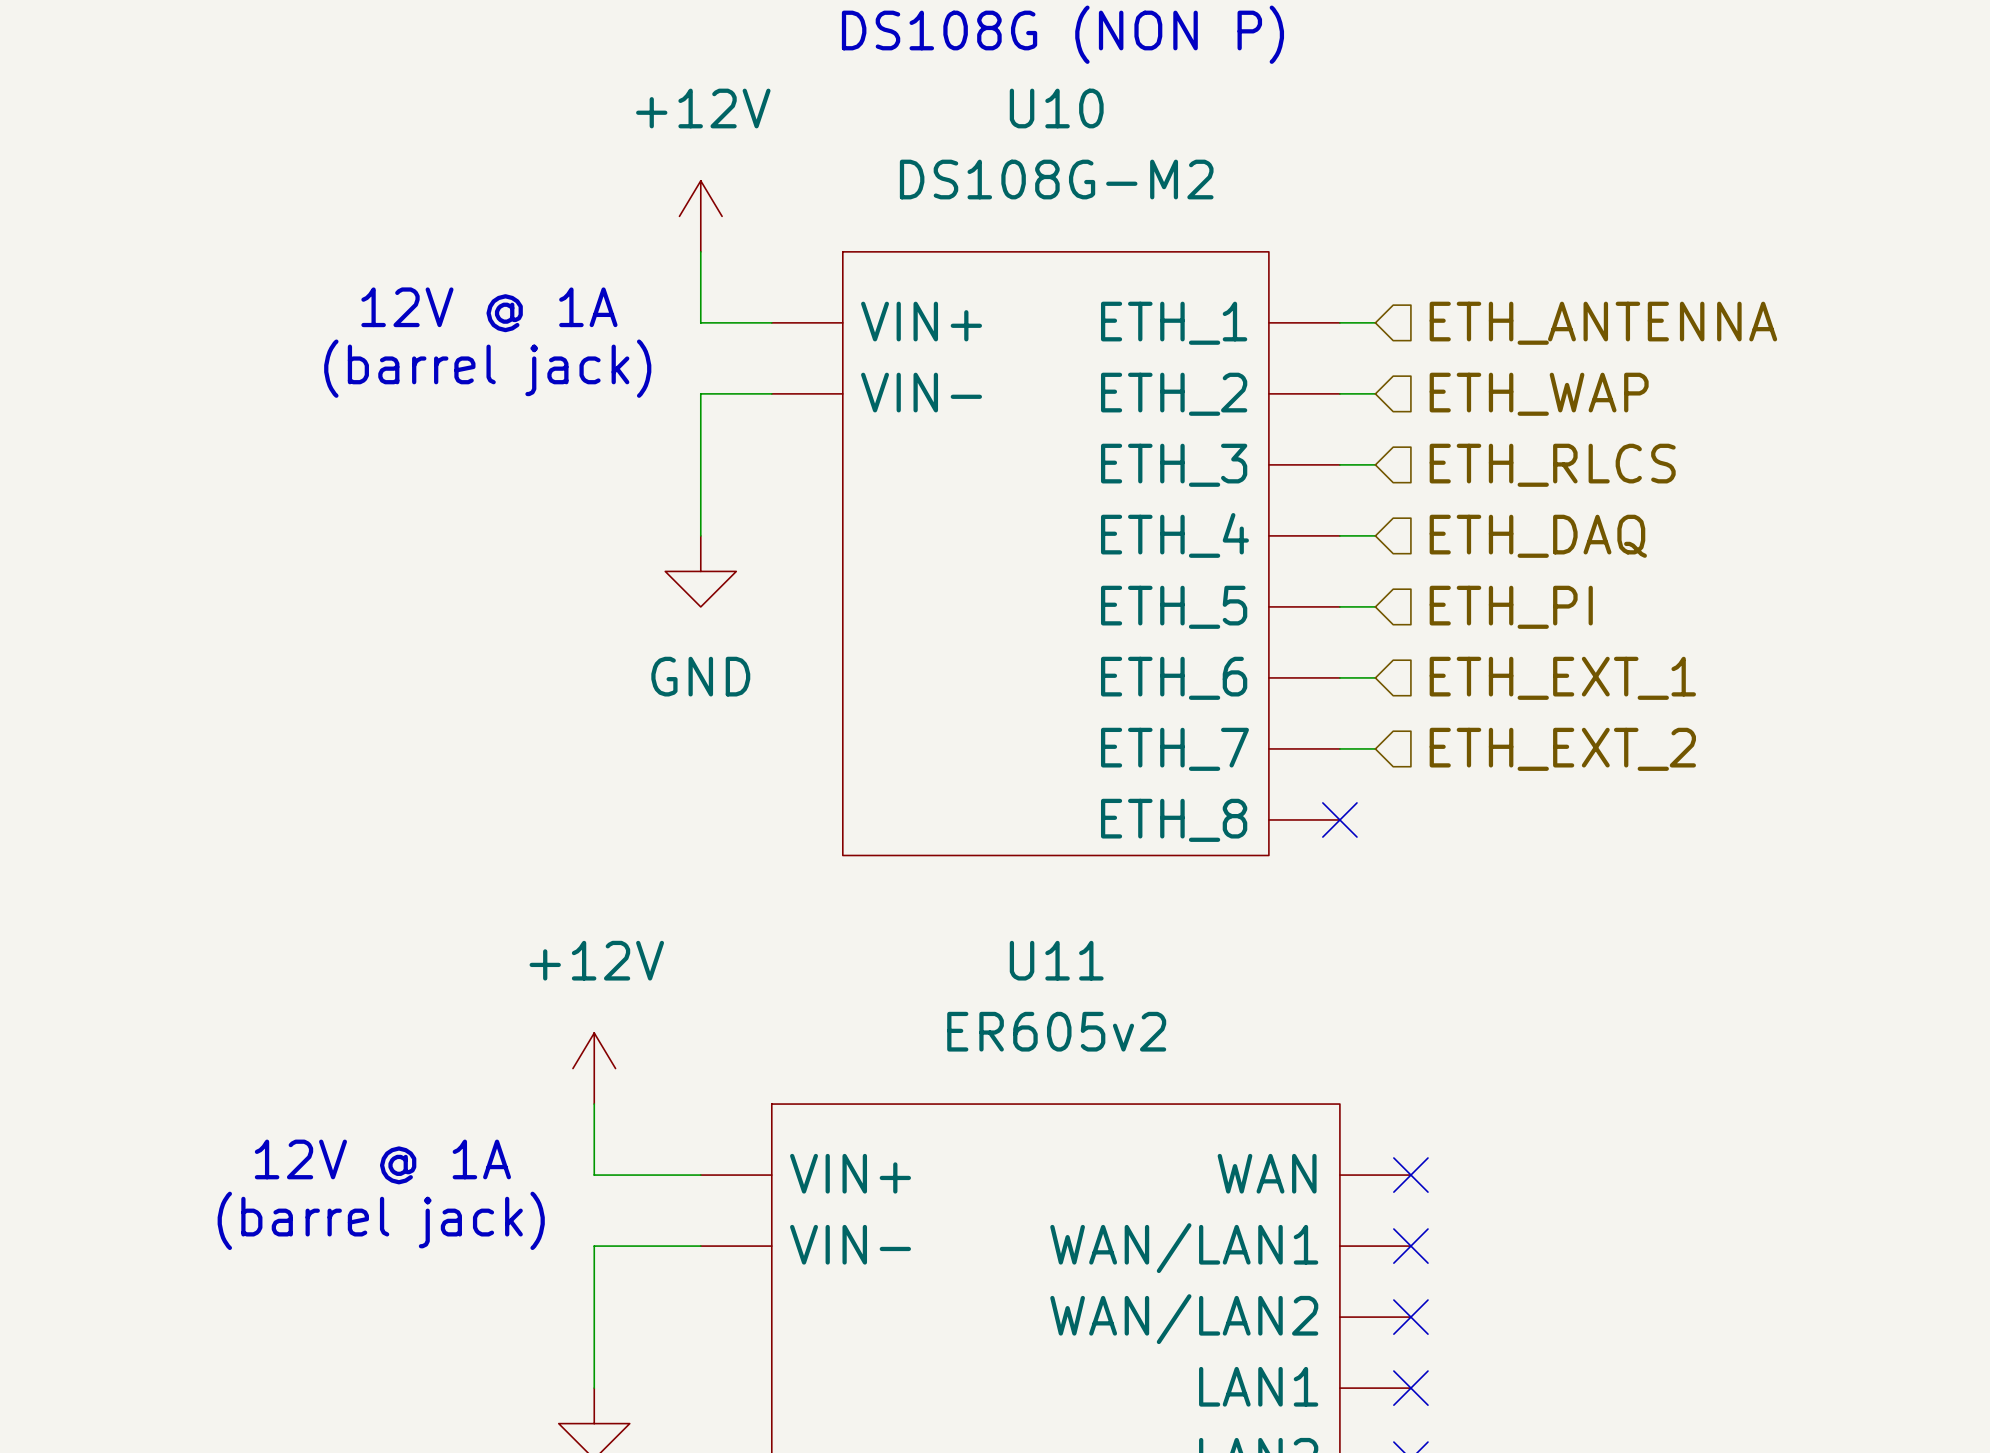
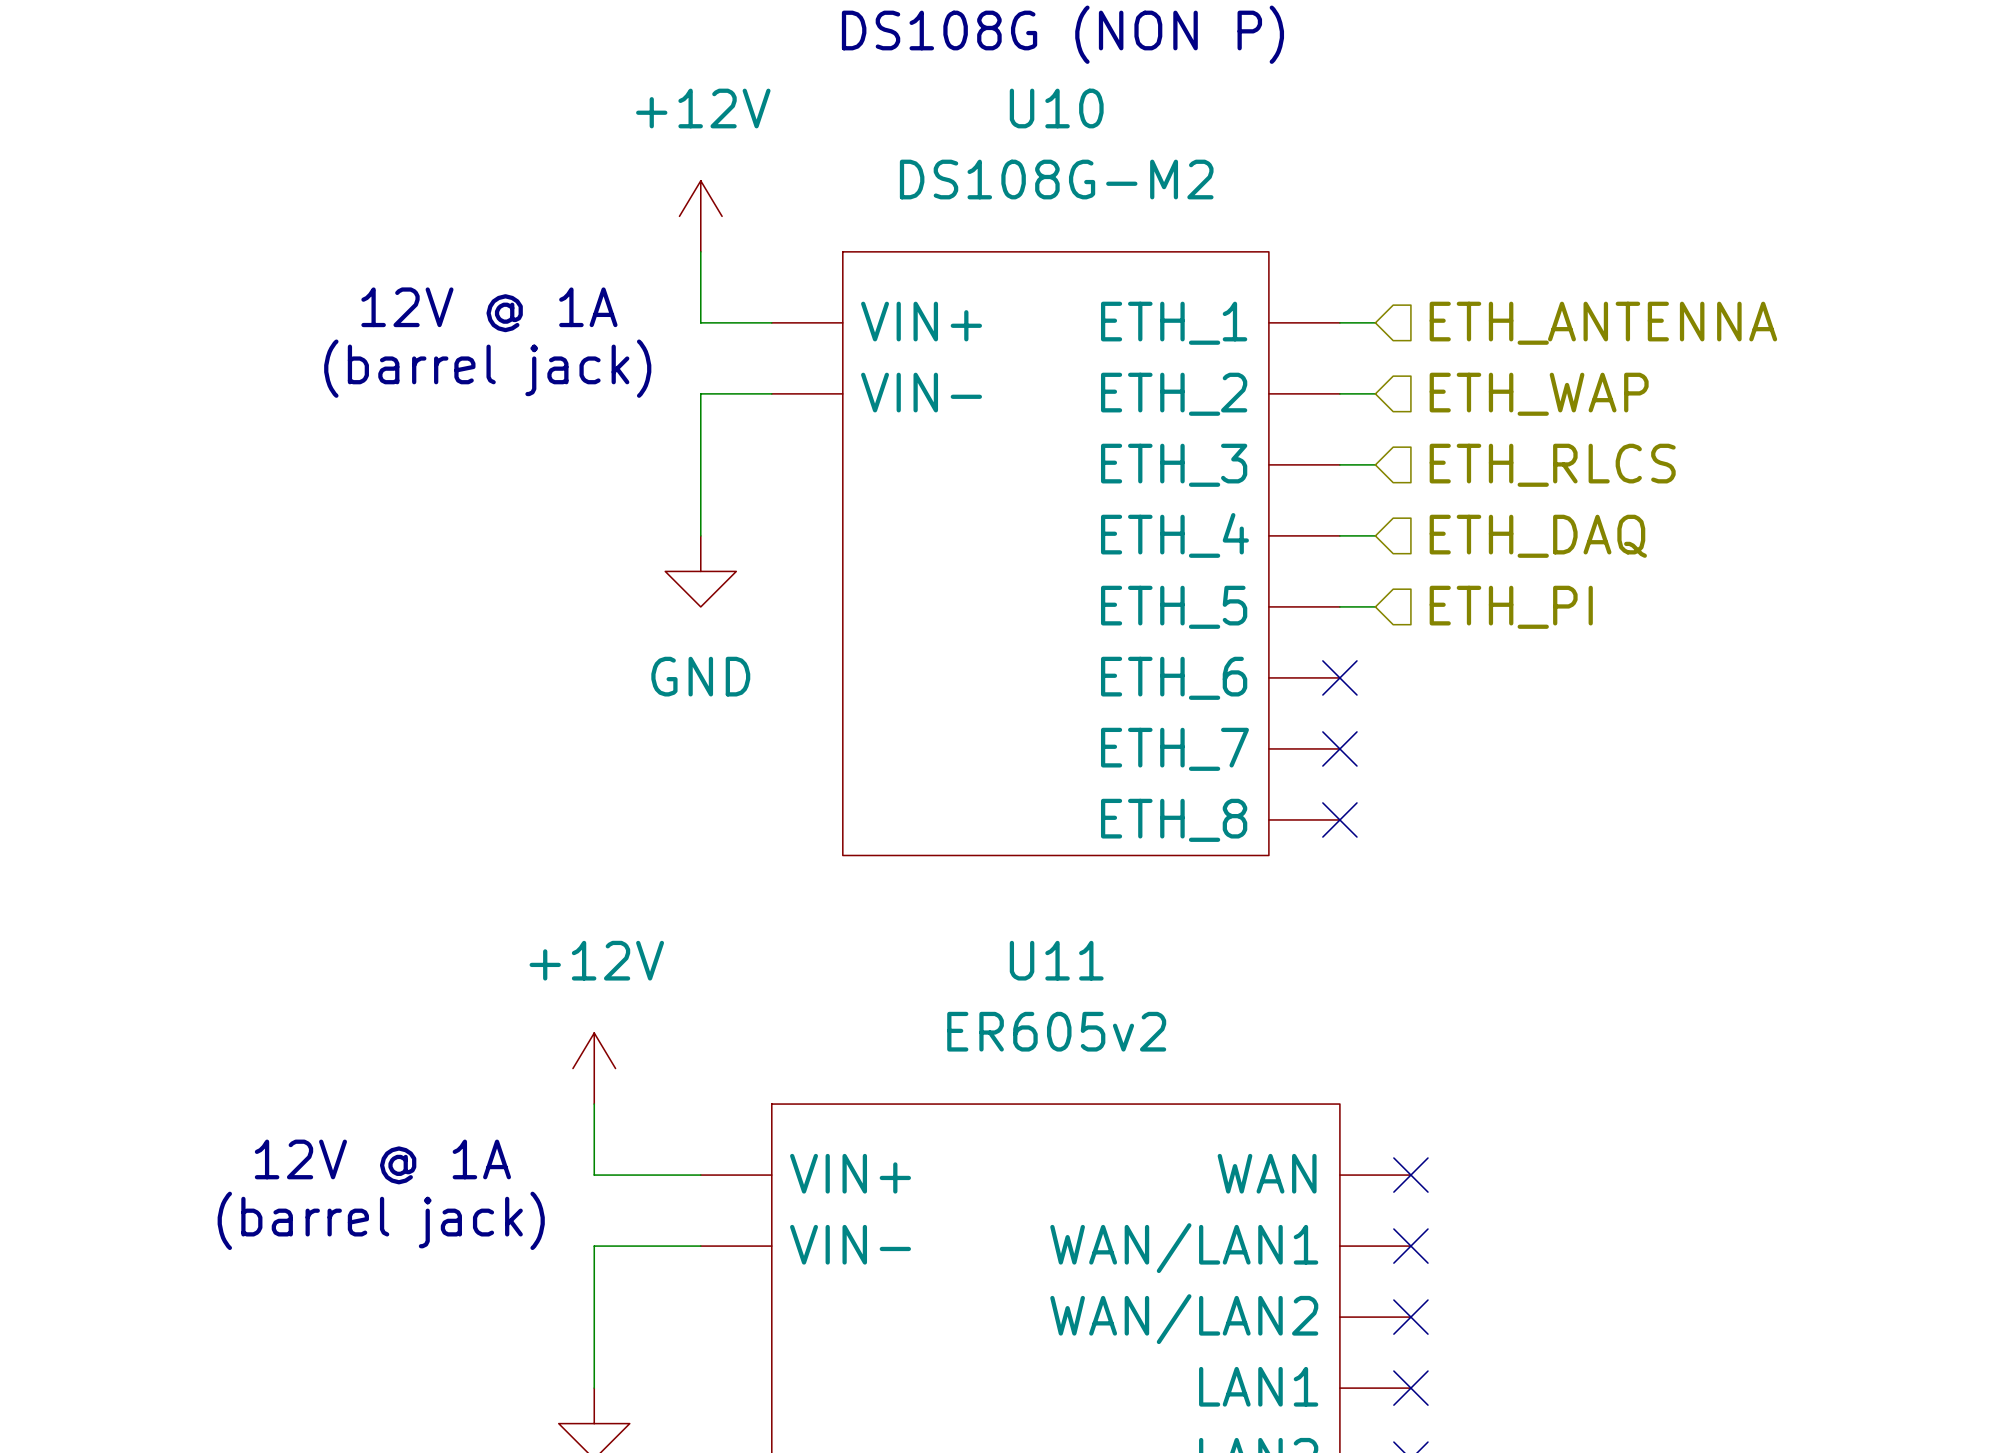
wire: (1339, 677) (1375, 677) -> none
no-connect mark: none -> (1339, 677)
hierarchical label: ETH_EXT_1 (1562, 678) -> none
wire: (1339, 748) (1375, 748) -> none
no-connect mark: none -> (1339, 748)
hierarchical label: ETH_EXT_2 (1562, 749) -> none

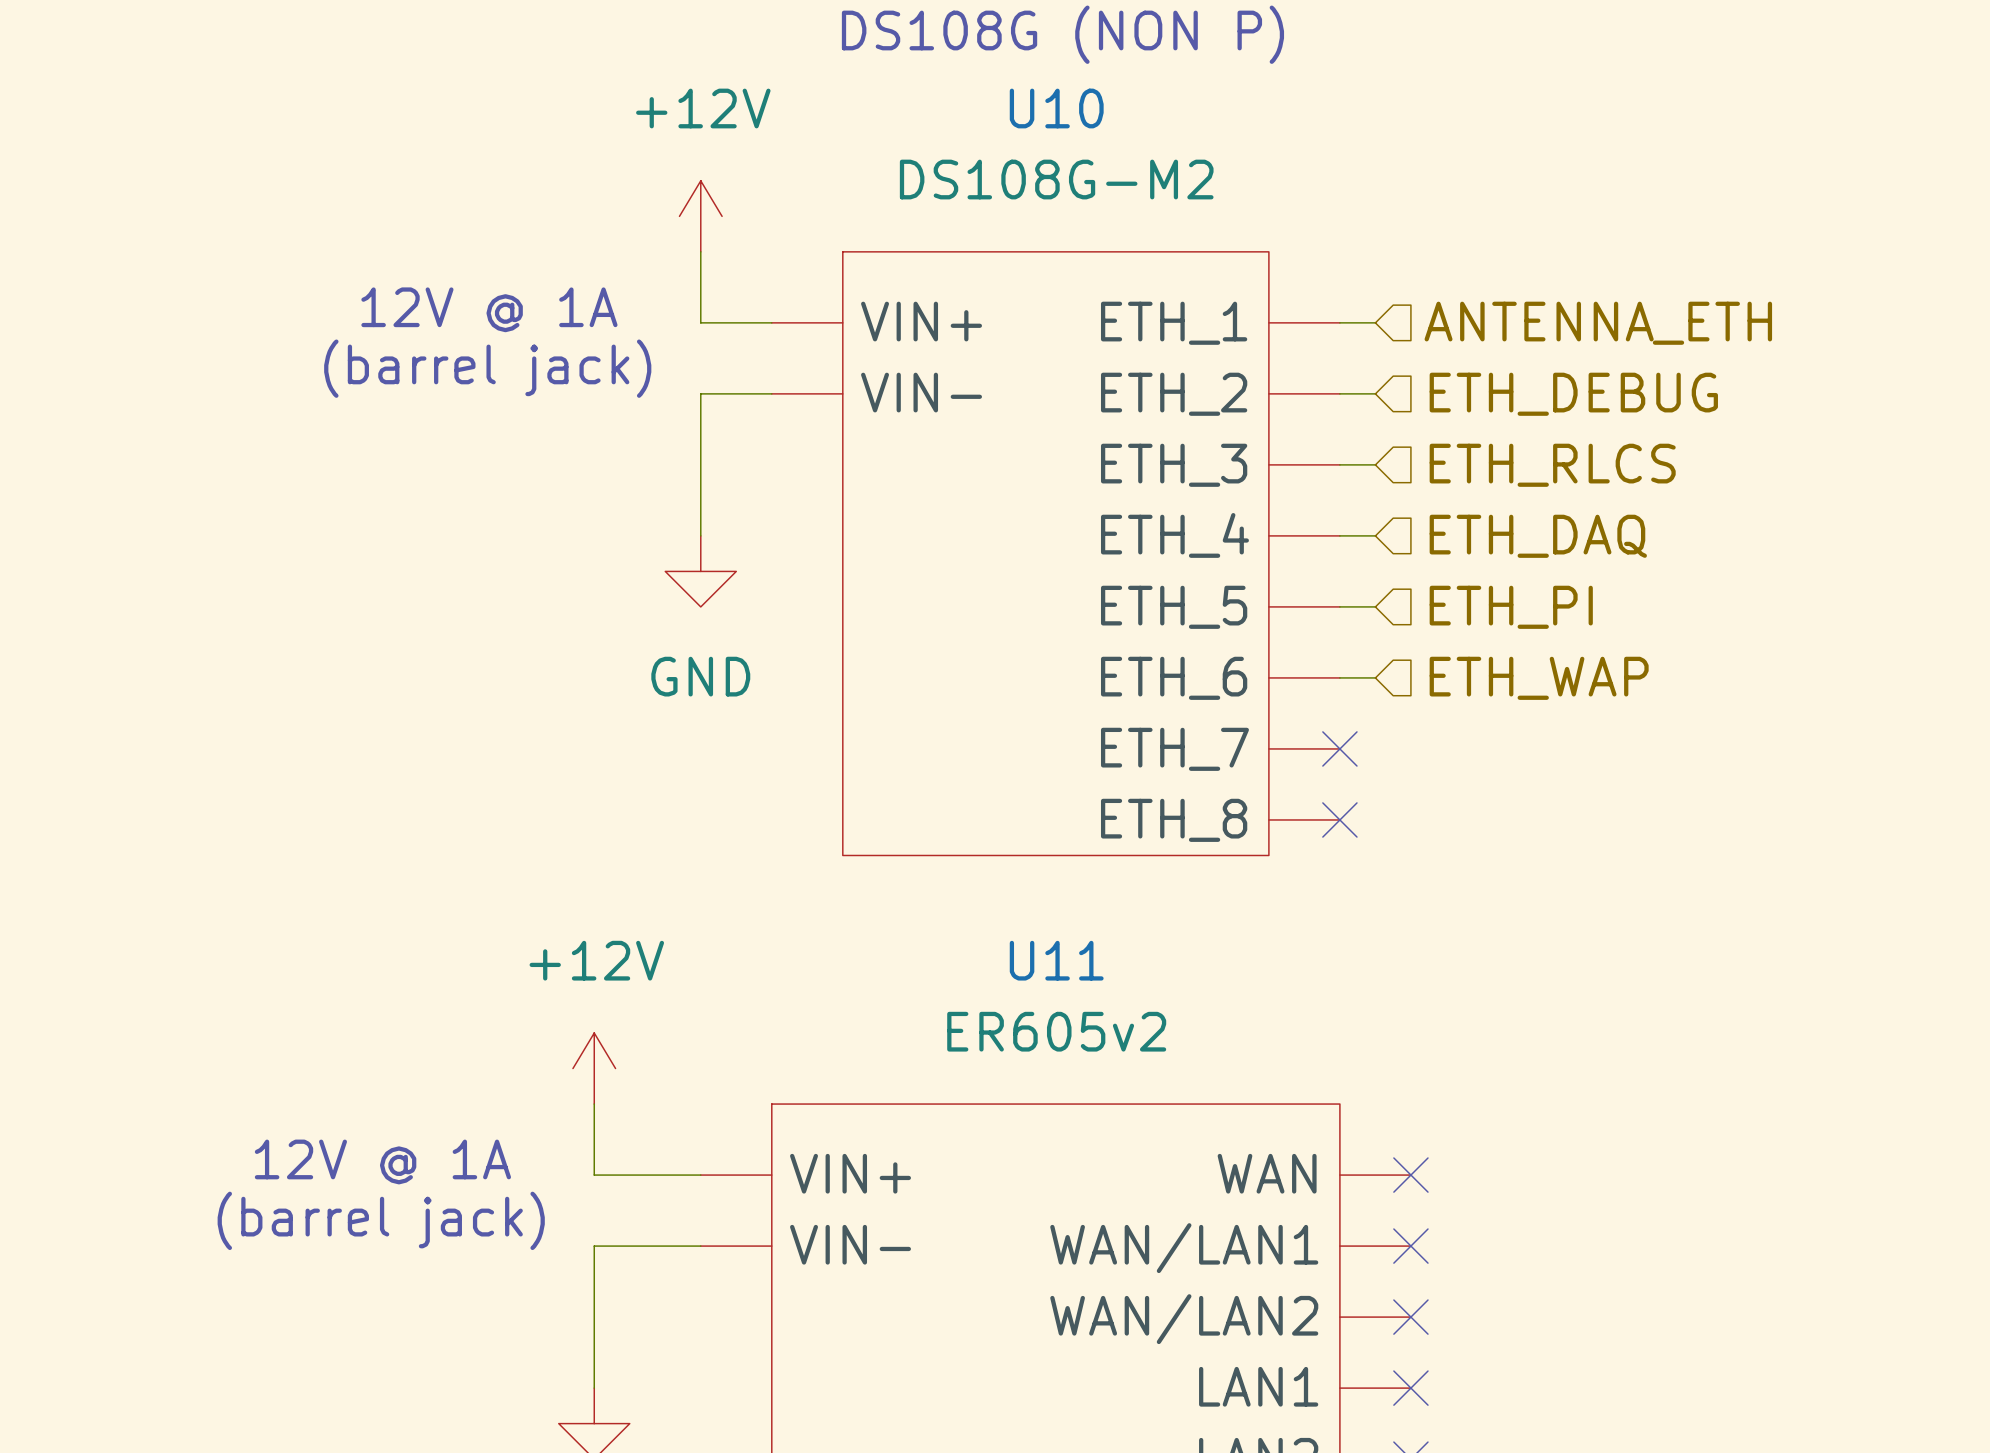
hierarchical label: ETH_ANTENNA (1603, 323) -> ANTENNA_ETH (1598, 323)
hierarchical label: ETH_WAP (1539, 394) -> ETH_DEBUG (1573, 394)
wire: none -> (1339, 677) (1375, 677)
no-connect mark: (1339, 677) -> none
hierarchical label: none -> ETH_WAP (1539, 678)

